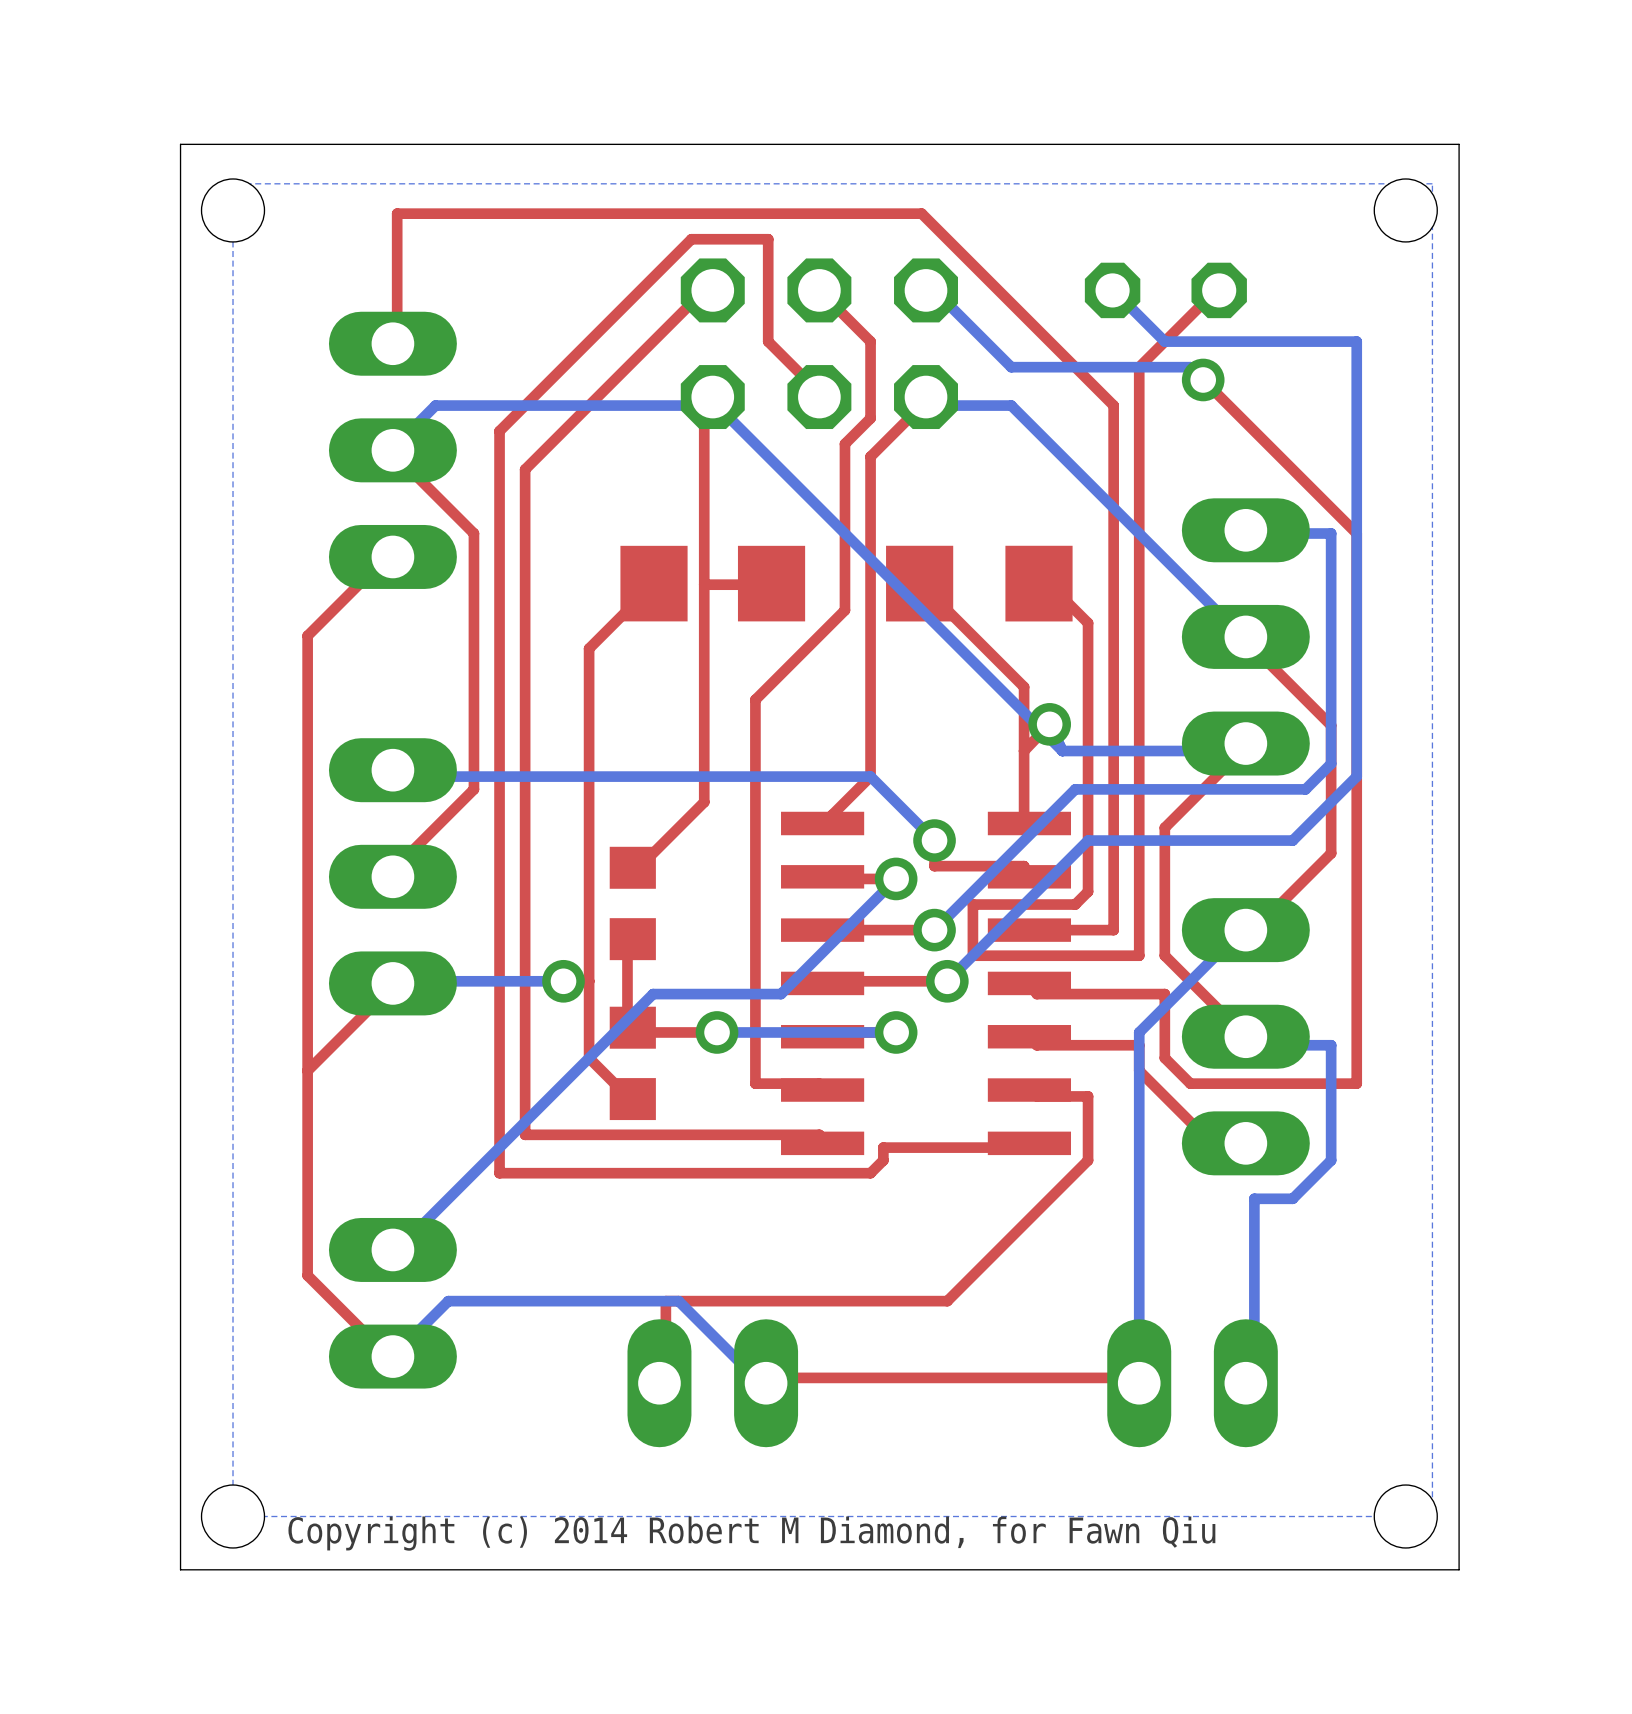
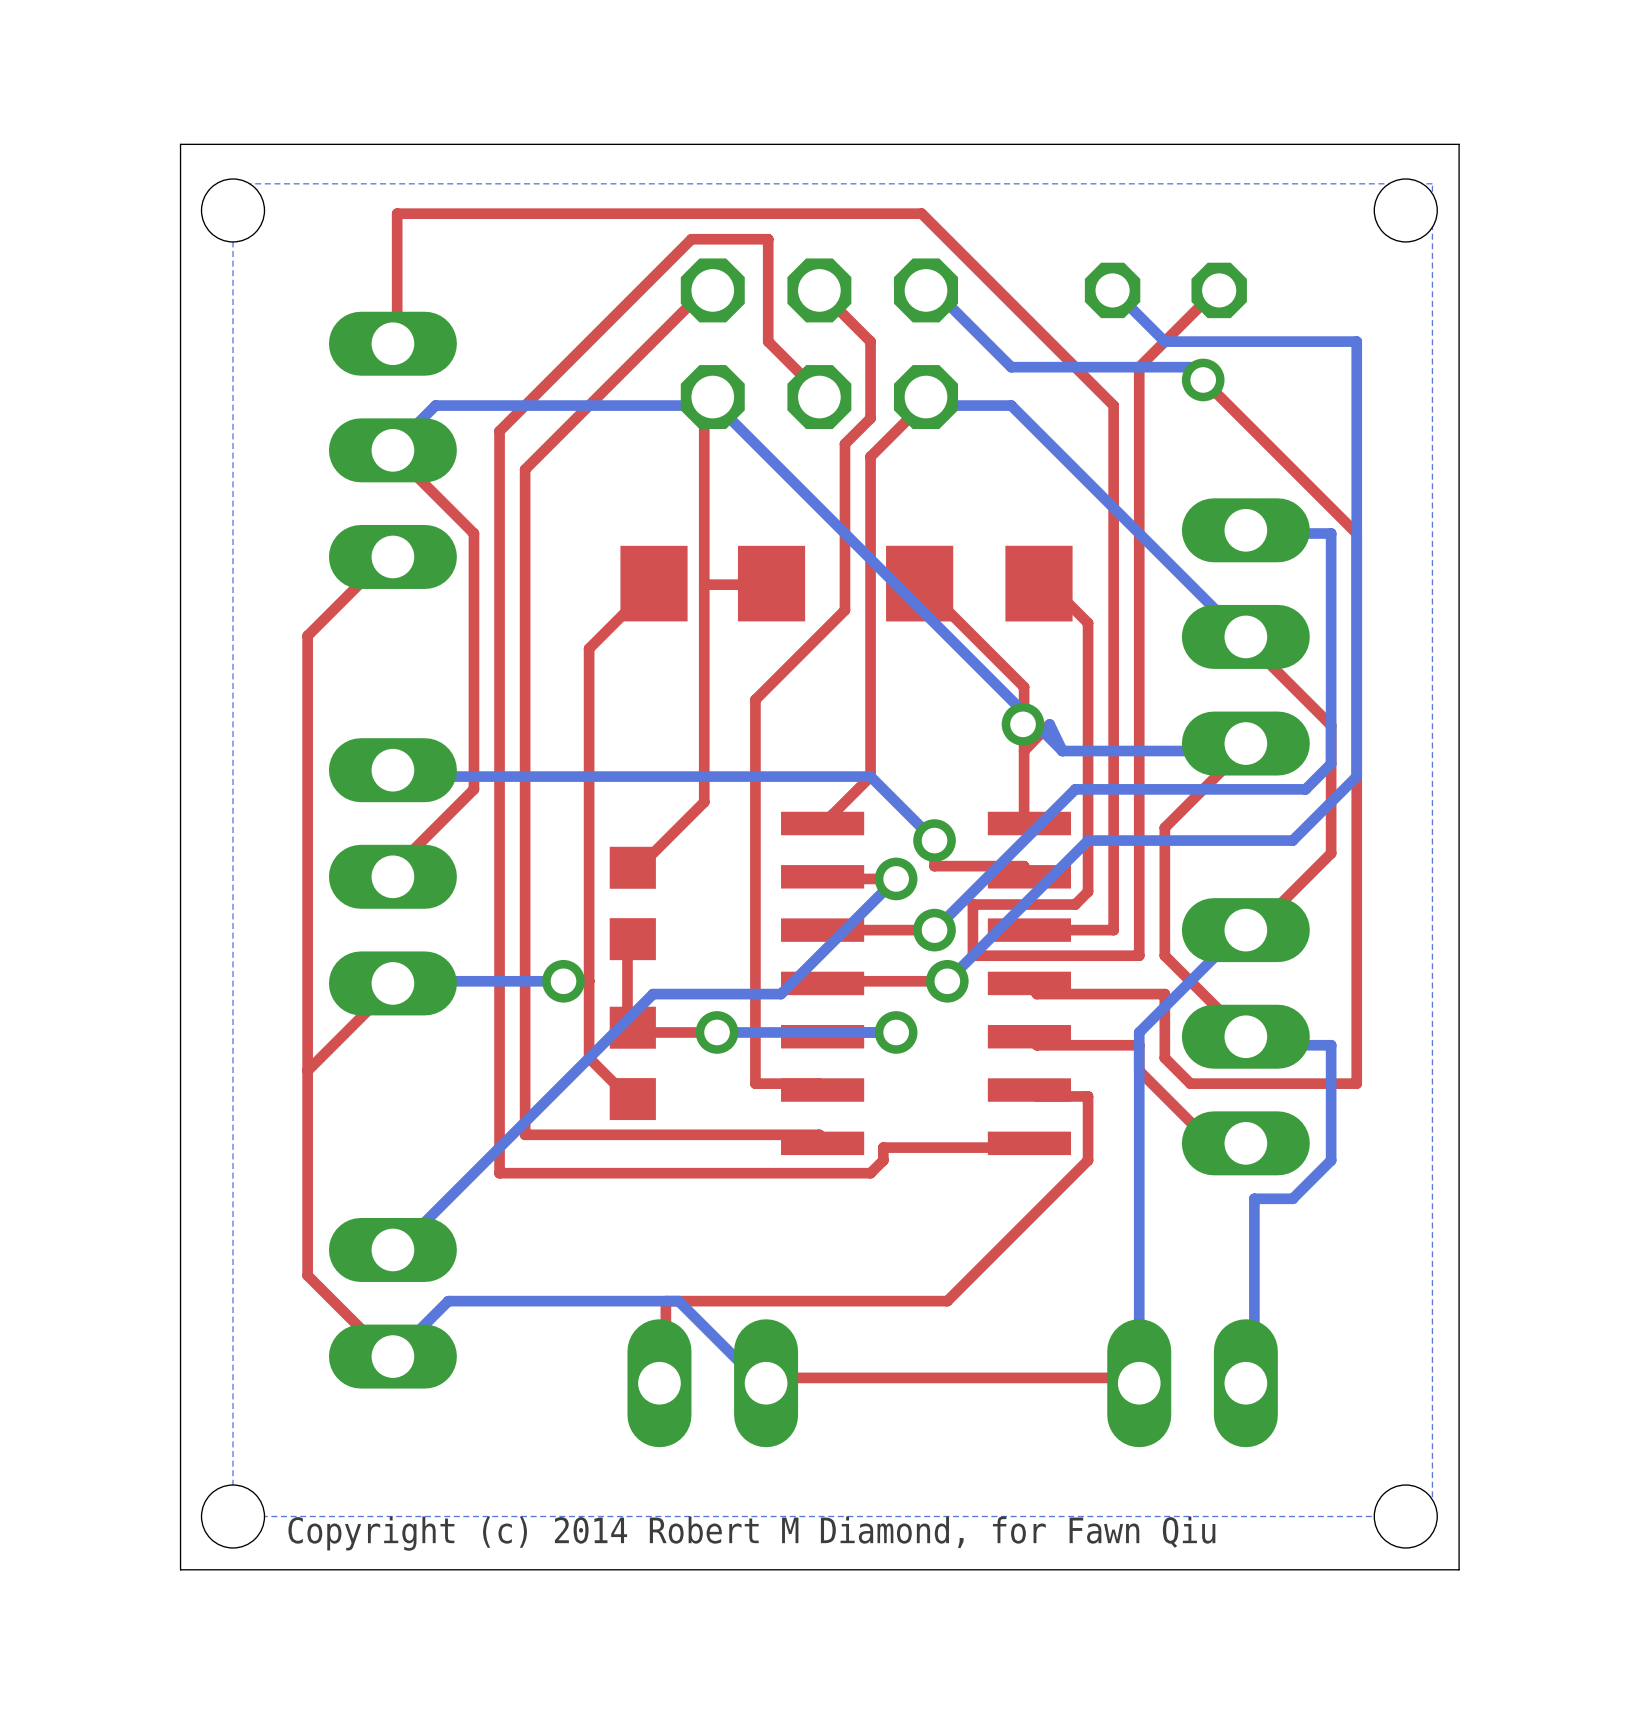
via position: (1049, 724) -> (1023, 724)

